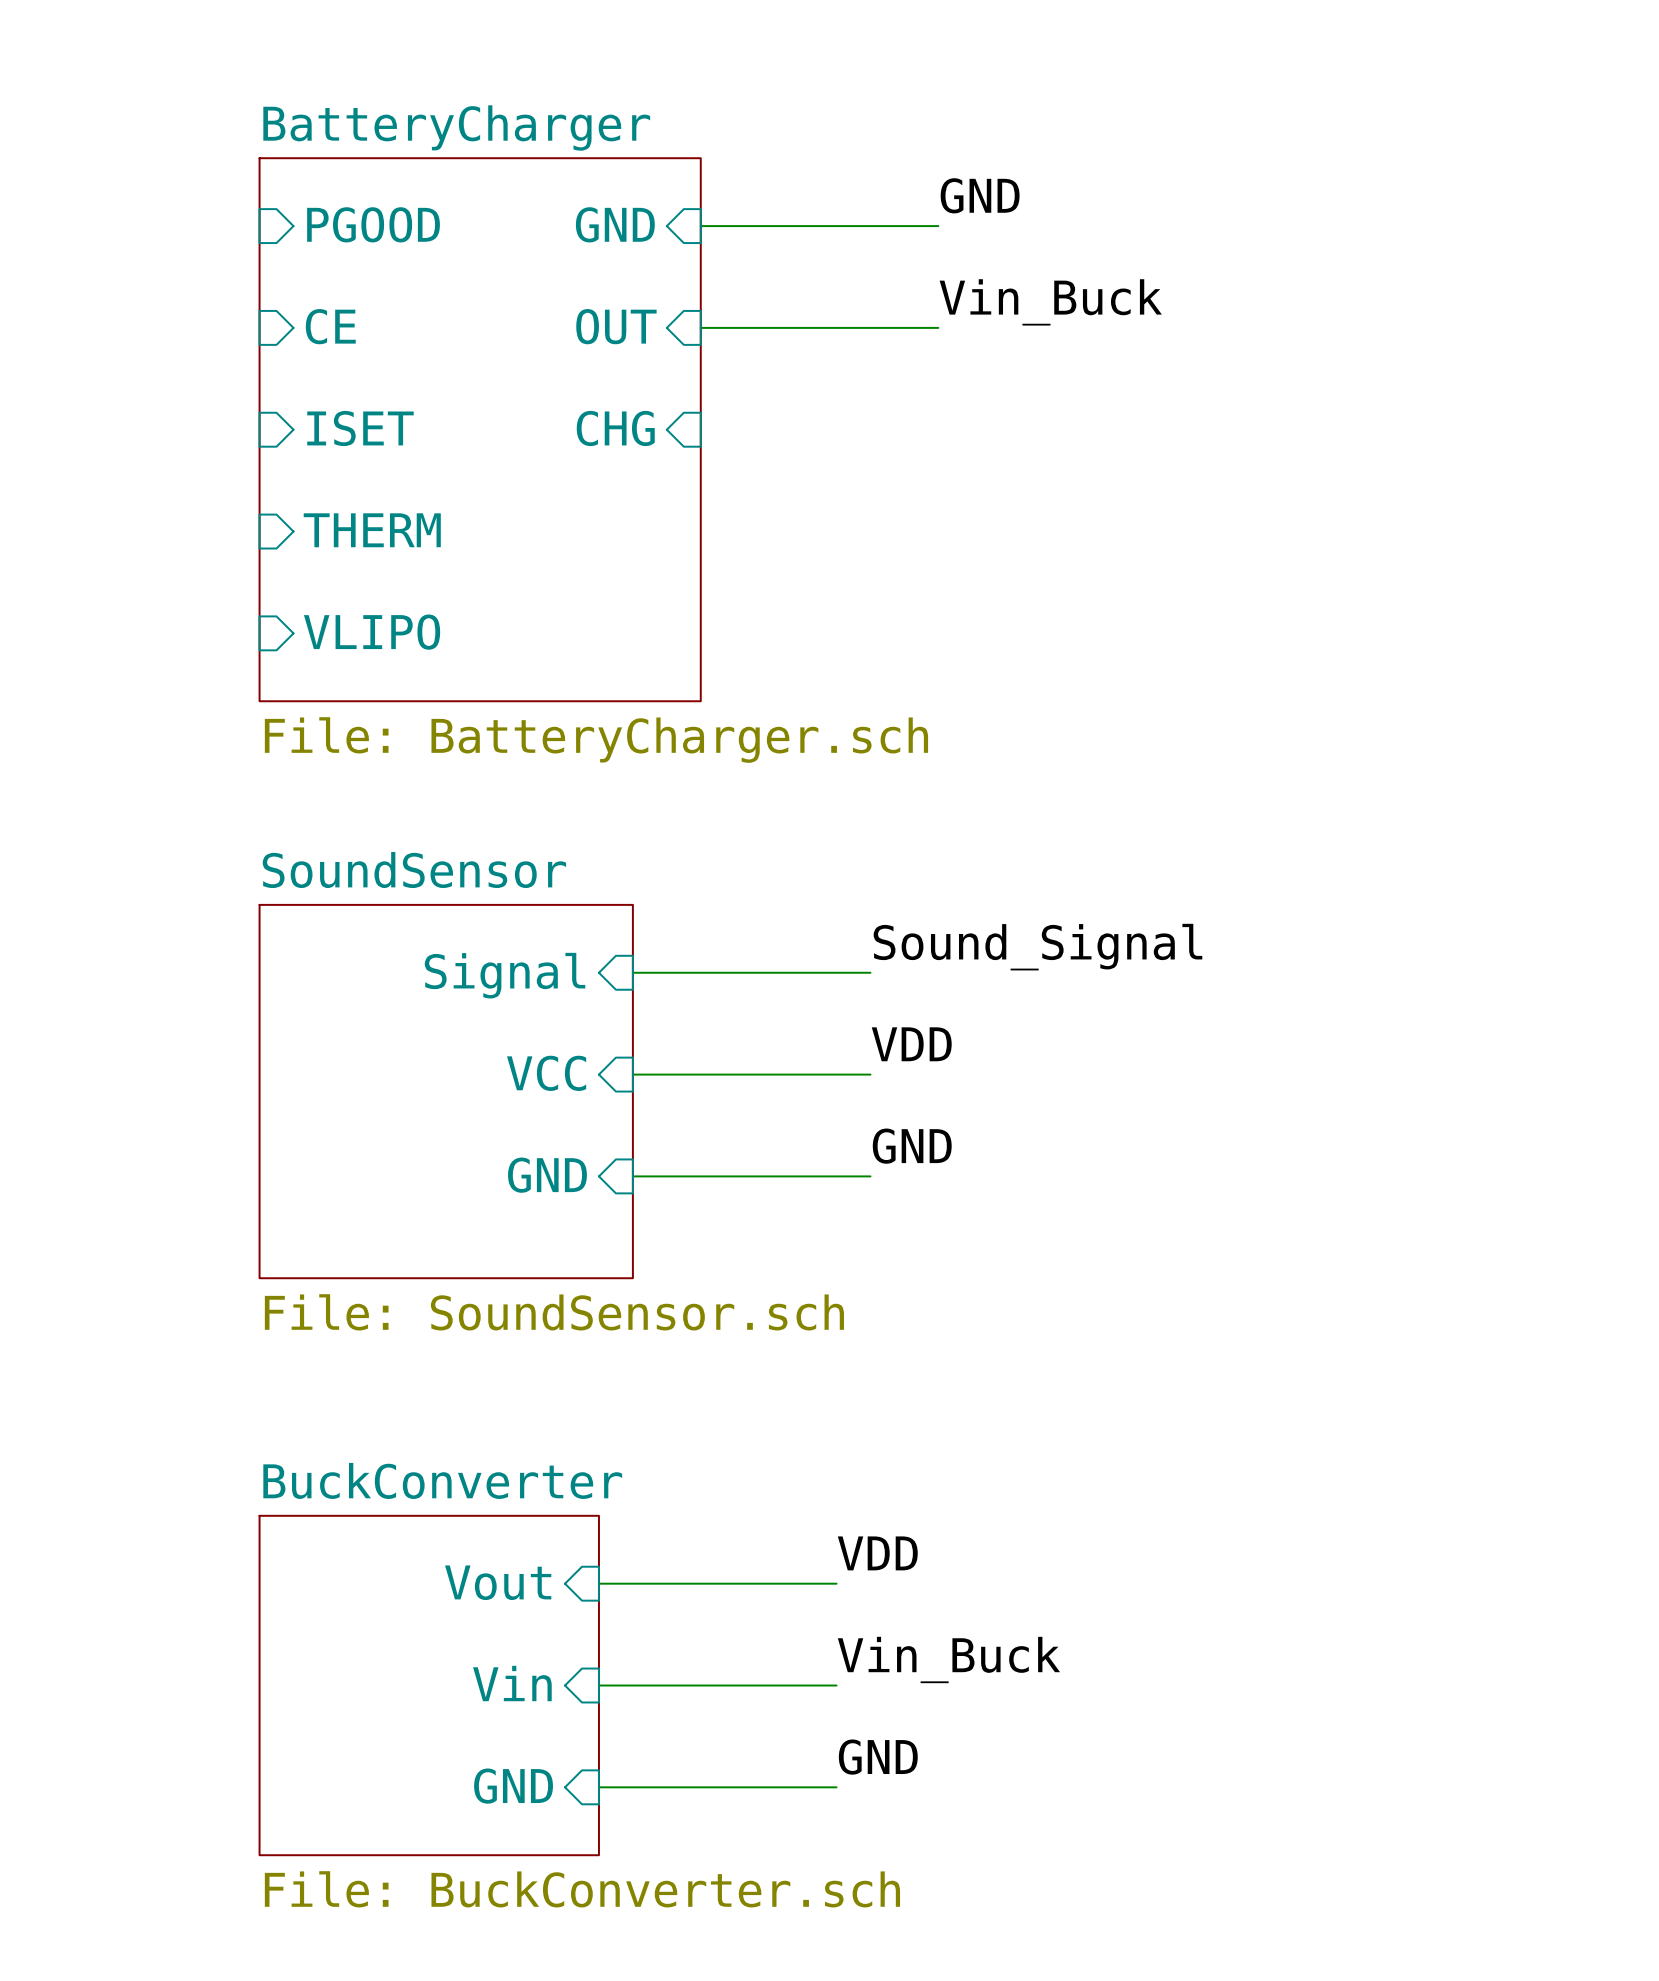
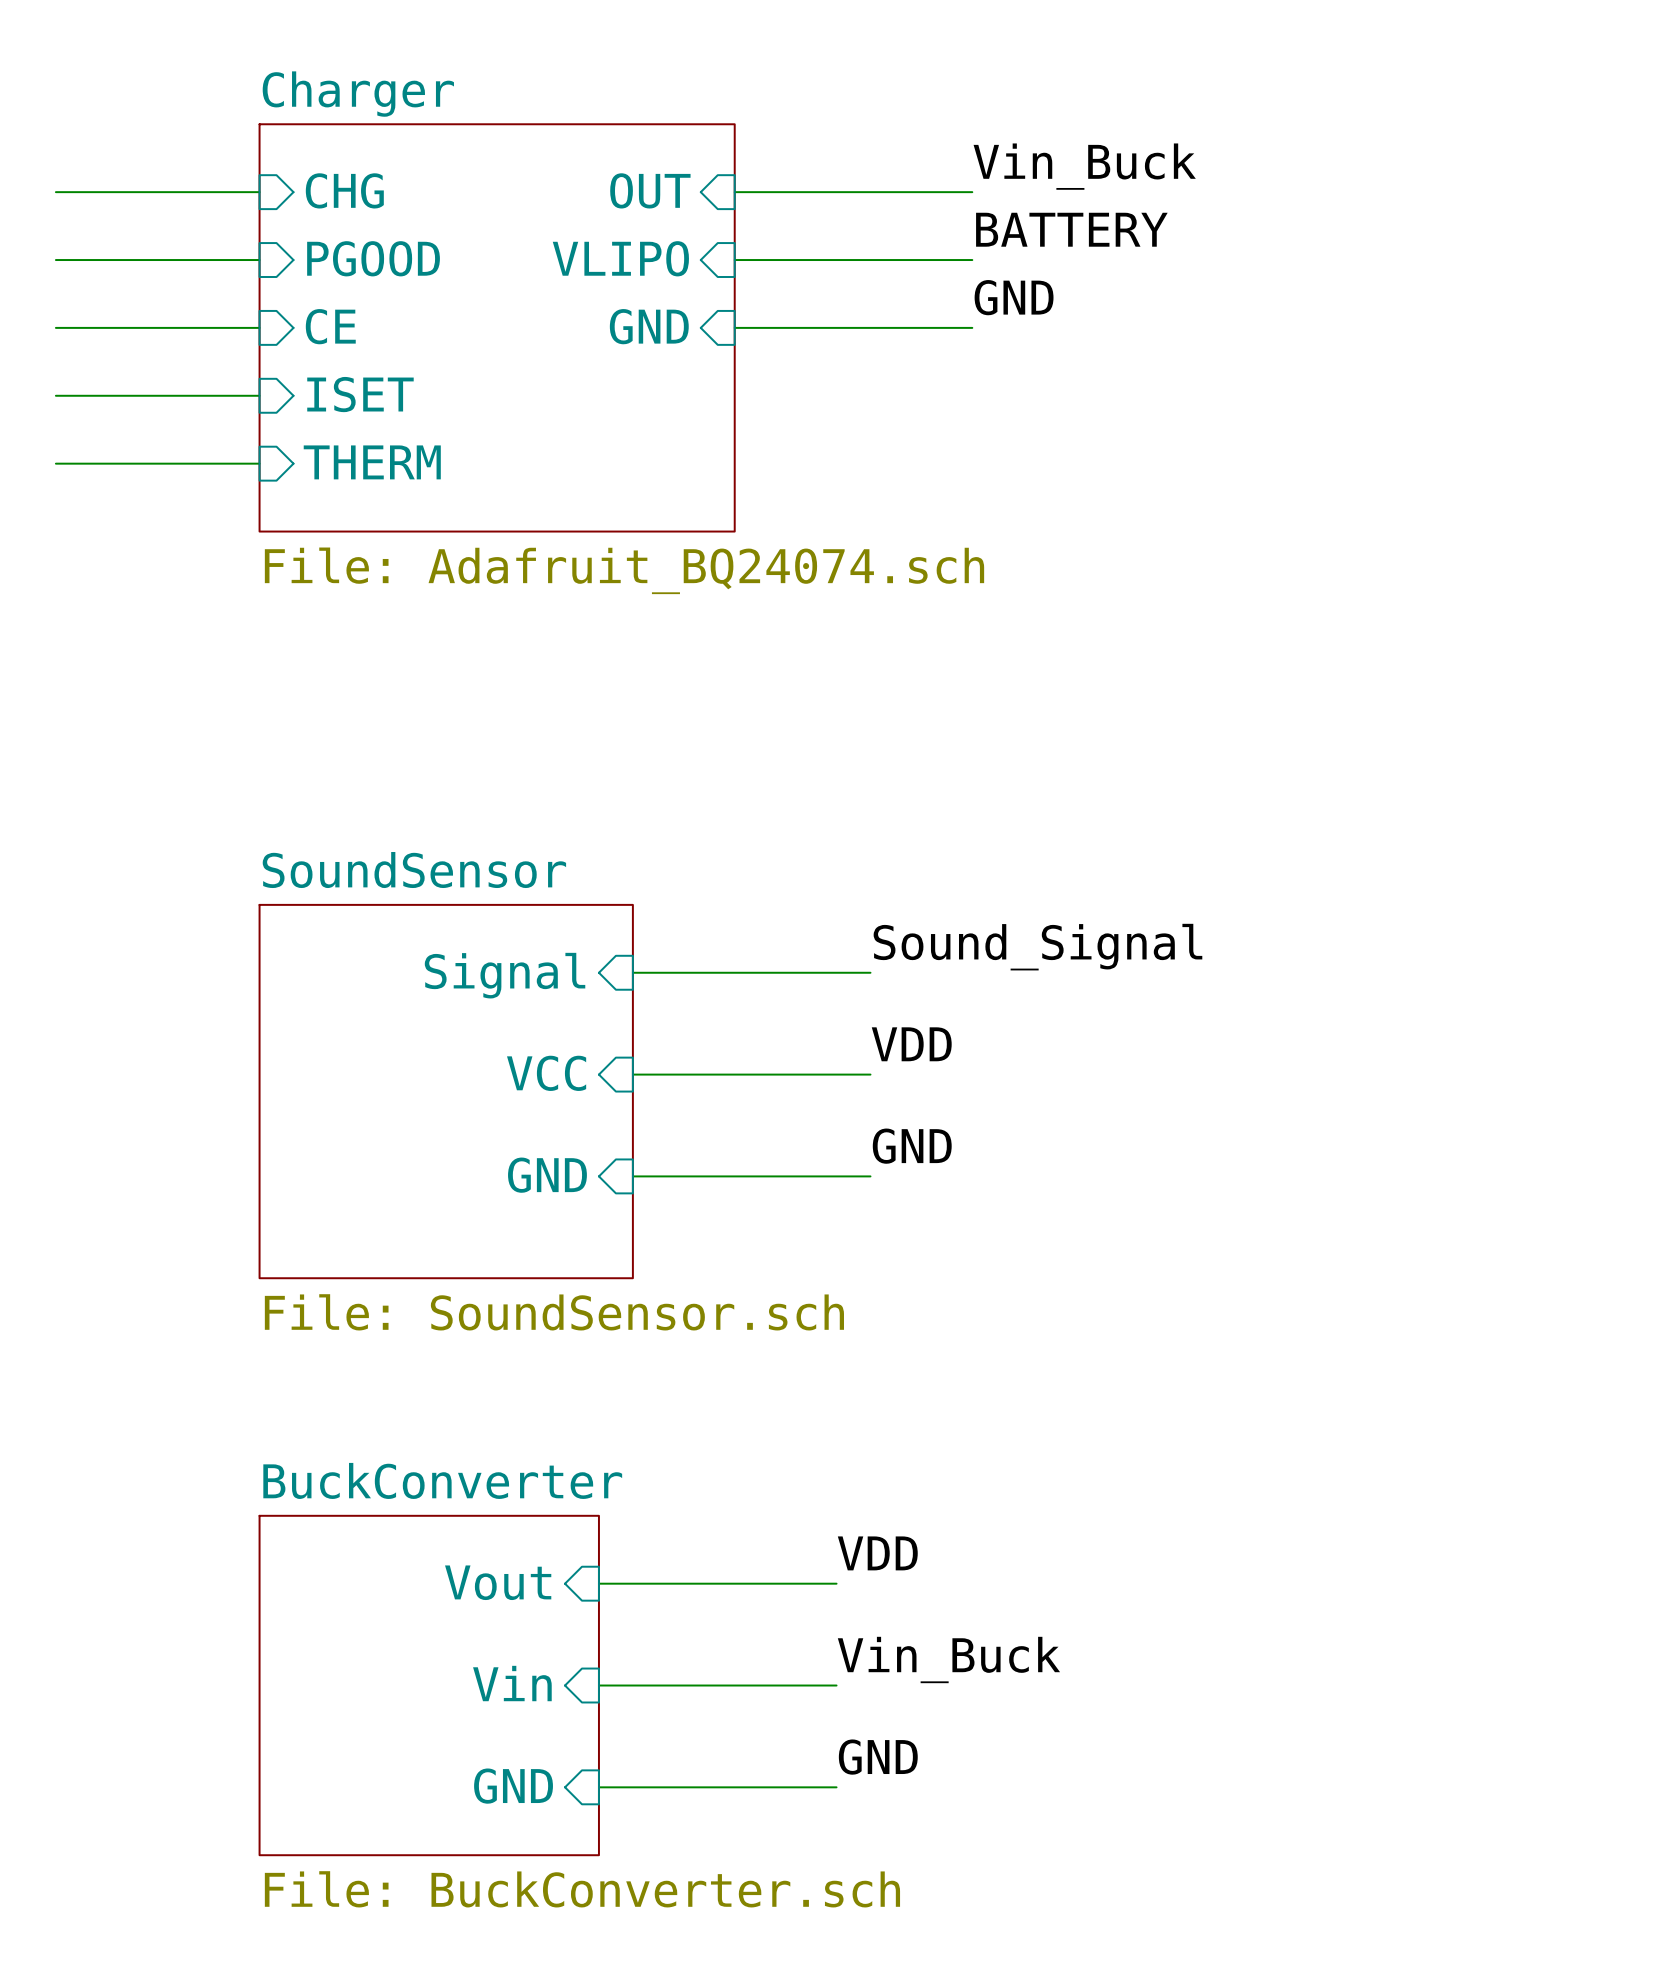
wire: none -> (55, 192) (259, 192)
label position: GND (980, 195) -> GND (1014, 297)
sheet pin position: PGOOD (373, 224) -> PGOOD (373, 258)
sheet pin position: GND (615, 224) -> GND (649, 326)
wire: (700, 226) (938, 226) -> (734, 192) (972, 192)
label: none -> BATTERY (1071, 229)
wire: none -> (55, 260) (259, 260)
wire: none -> (734, 260) (972, 260)
label position: Vin_Buck (1050, 302) -> Vin_Buck (1084, 166)
sheet pin position: OUT (616, 326) -> OUT (650, 190)
wire: none -> (55, 327) (259, 327)
sheet Charger: none -> File: Adafruit_BQ24074.sch (497, 327)
wire: (700, 327) (734, 327) -> (938, 327) (972, 327)
wire: none -> (55, 395) (259, 395)
sheet pin position: ISET (360, 428) -> ISET (360, 394)
sheet pin rotation: 0° (615, 428) -> 180° (344, 190)
sheet pin position: CHG (615, 428) -> CHG (344, 190)
sheet BatteryCharger: File: BatteryCharger.sch (480, 429) -> none
wire: none -> (55, 463) (259, 463)
sheet pin position: THERM (372, 530) -> THERM (372, 462)
sheet pin rotation: 0° (372, 632) -> 180° (620, 258)
sheet pin position: VLIPO (372, 632) -> VLIPO (620, 258)

